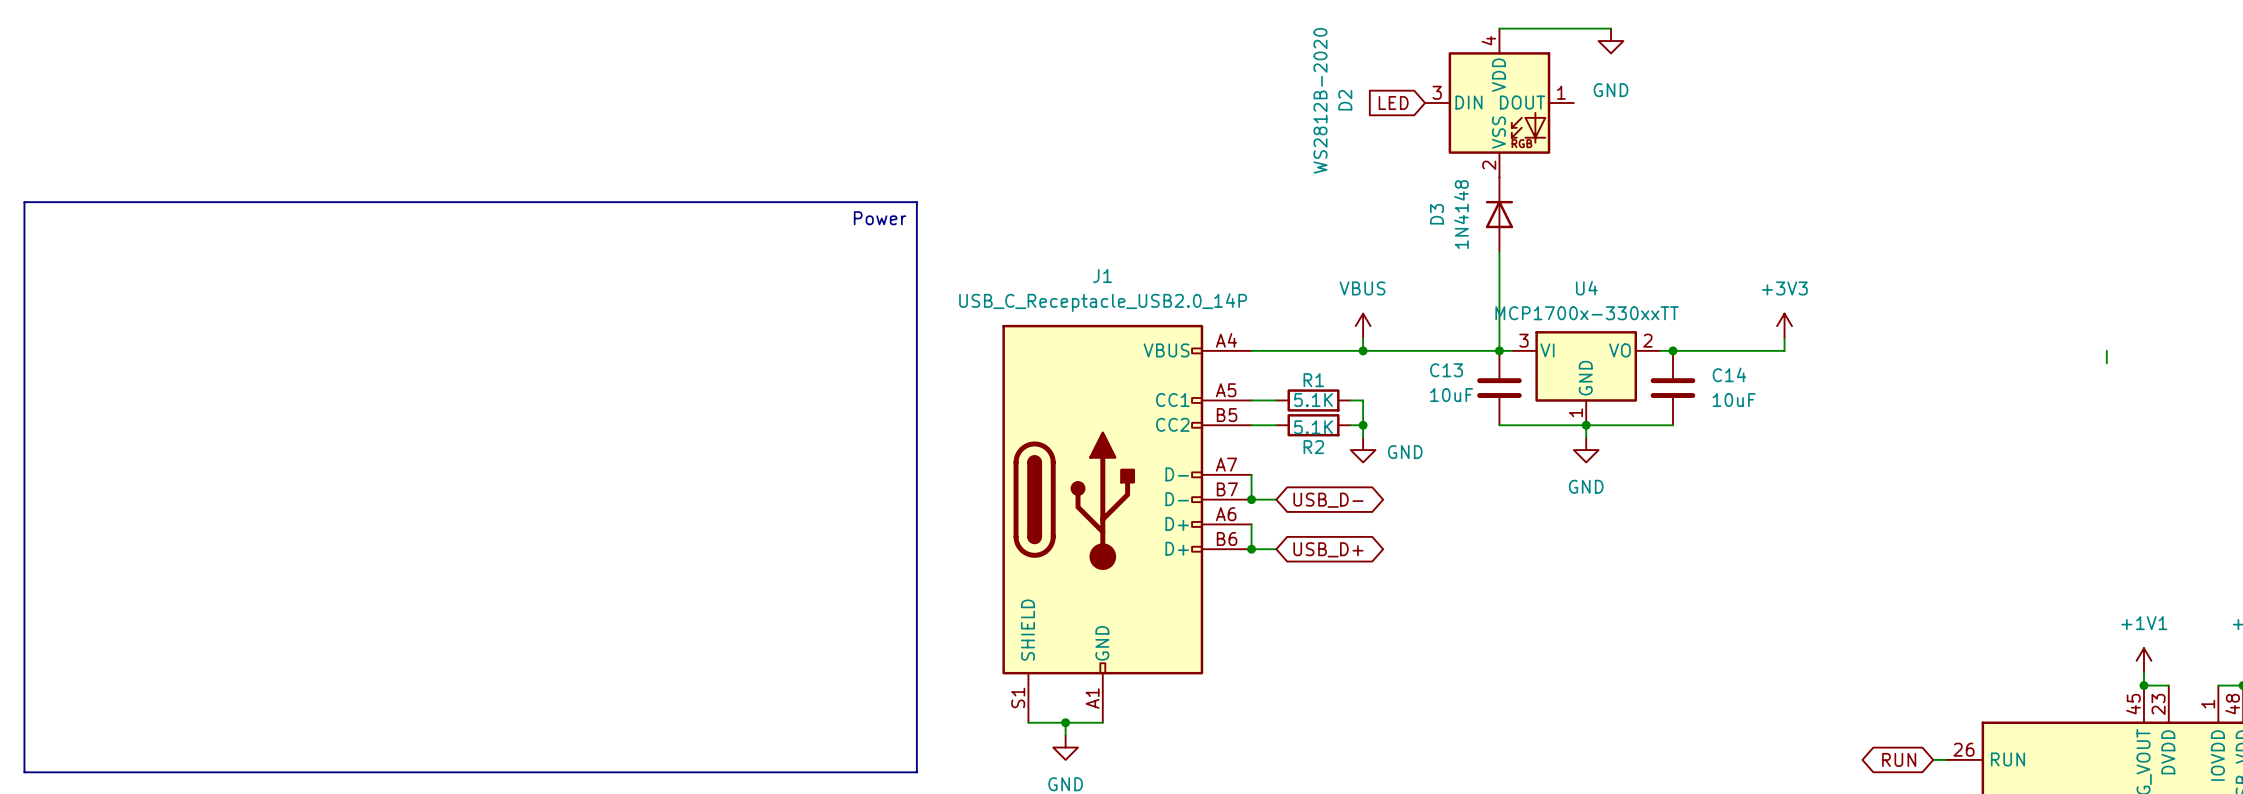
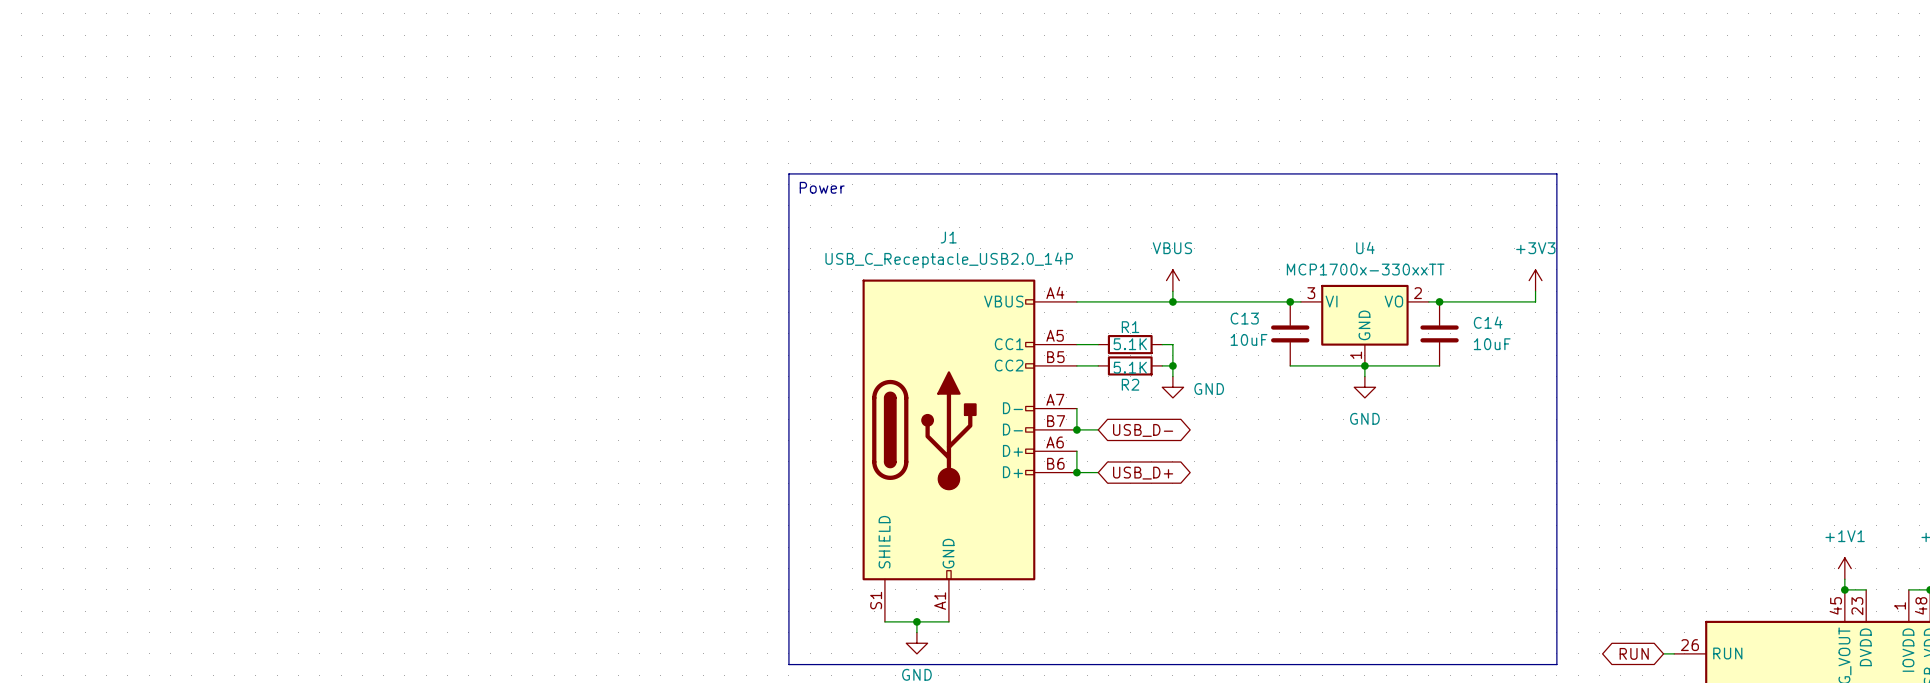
wire: (1499, 28) (1611, 28) -> none
power symbol: GND (1611, 41) -> none
global label: LED (1393, 102) -> none
D2: WS2812B-2020 (1499, 102) -> none
line: (916, 202) (24, 202) (24, 772) (916, 772) -> (788, 173) (1556, 173) (1556, 664) (788, 664)
D3: 1N4148 (1499, 214) -> none
text position: Power (880, 218) -> Power (822, 187)
wire: (1499, 251) (1499, 350) -> none
wire: (2106, 350) (2106, 363) -> none

